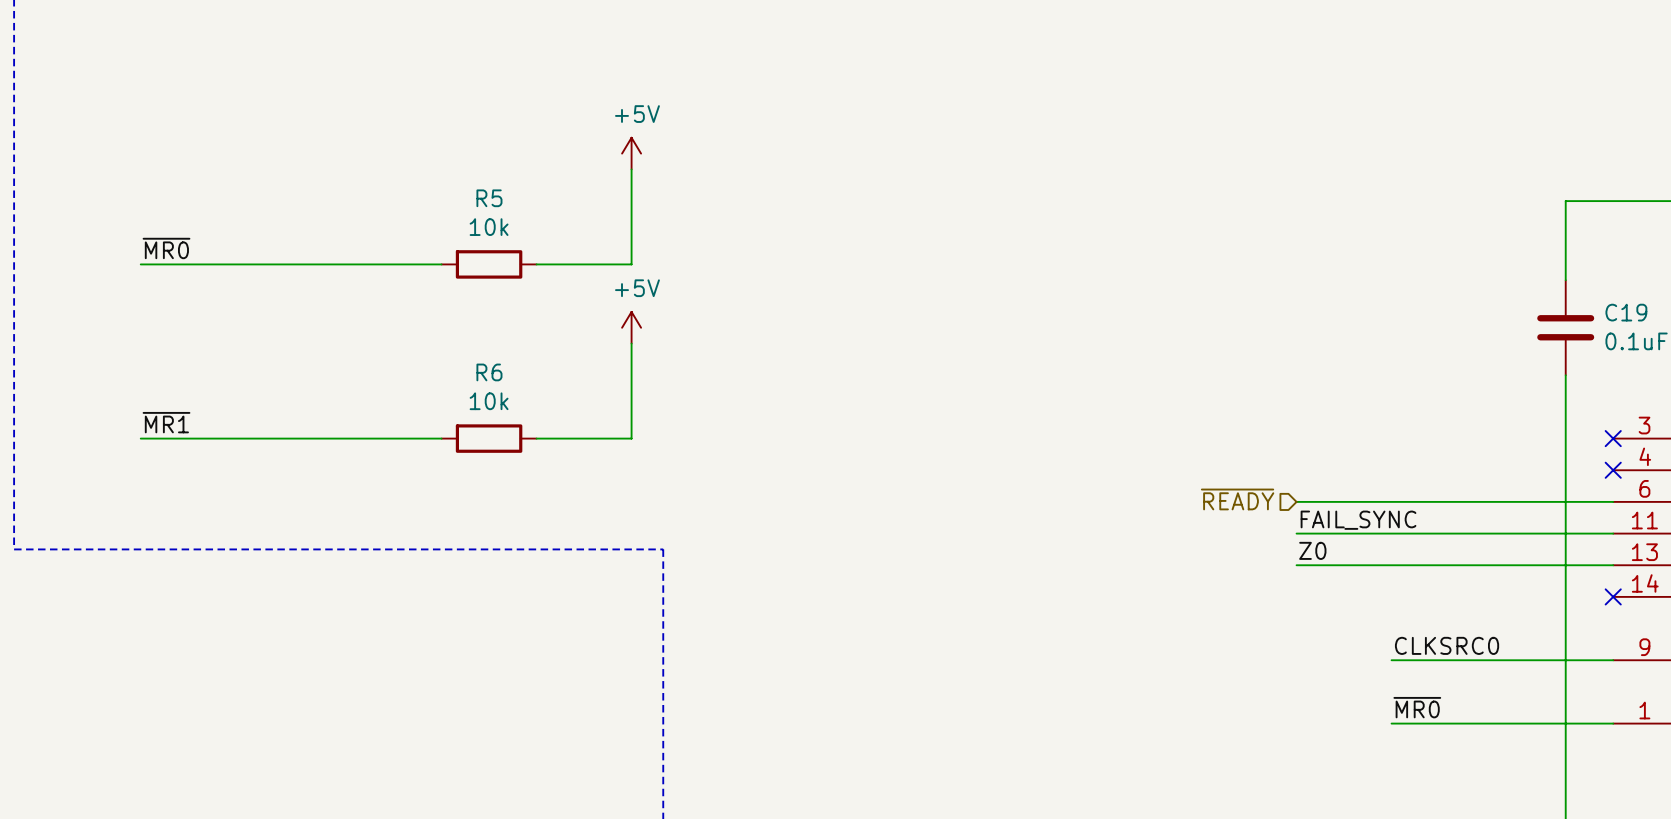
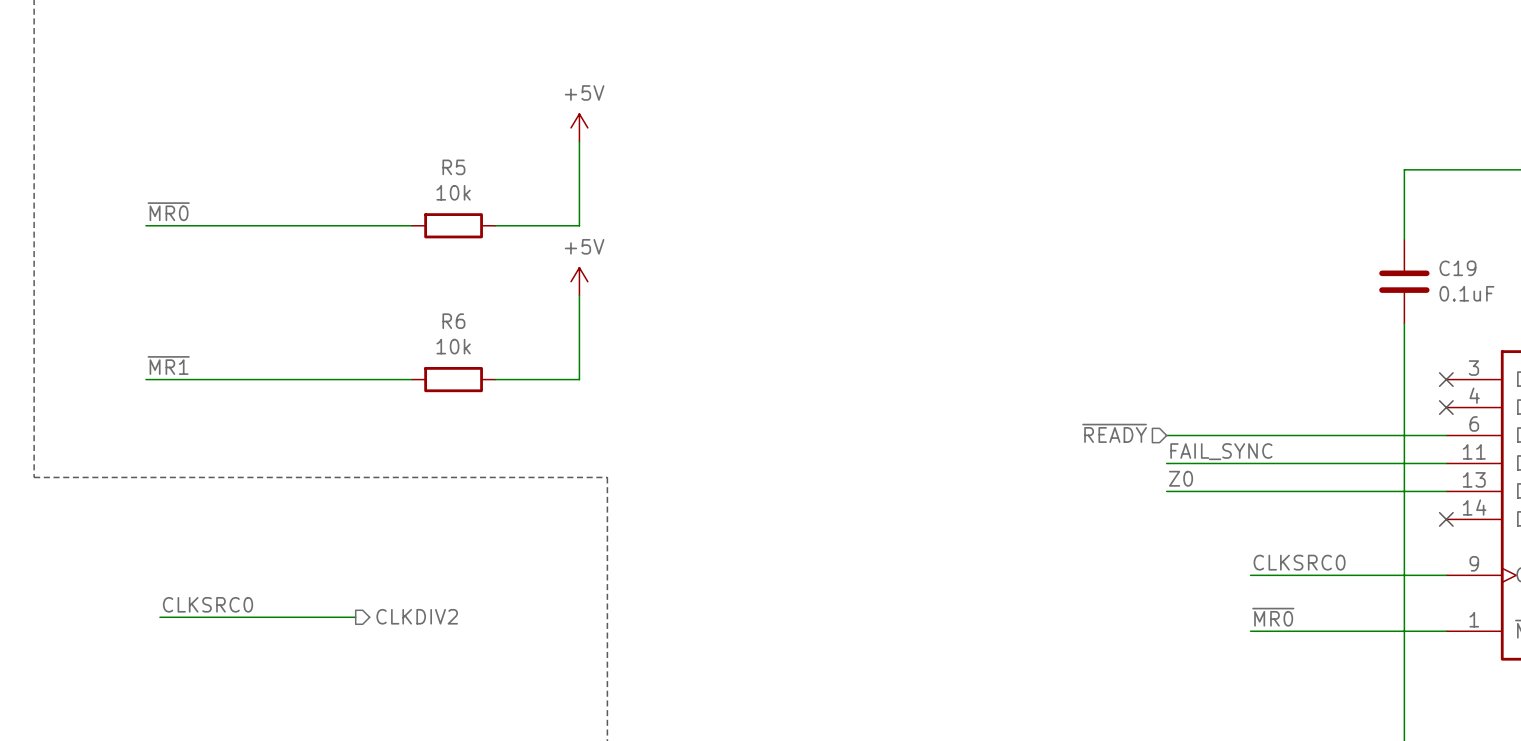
label: none -> CLKSRC0 (208, 604)
wire: none -> (159, 617) (355, 617)
hierarchical label: none -> CLKDIV2 (417, 616)

